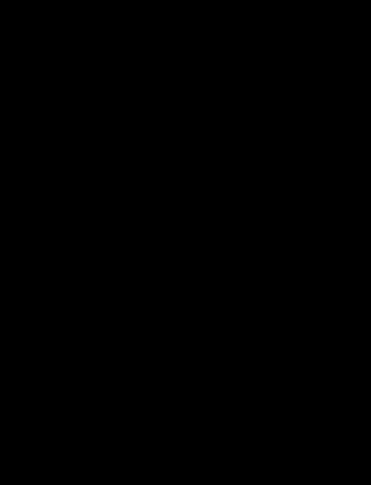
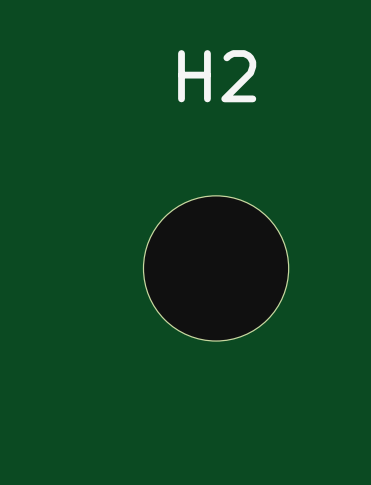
H2: none -> (216, 268)

